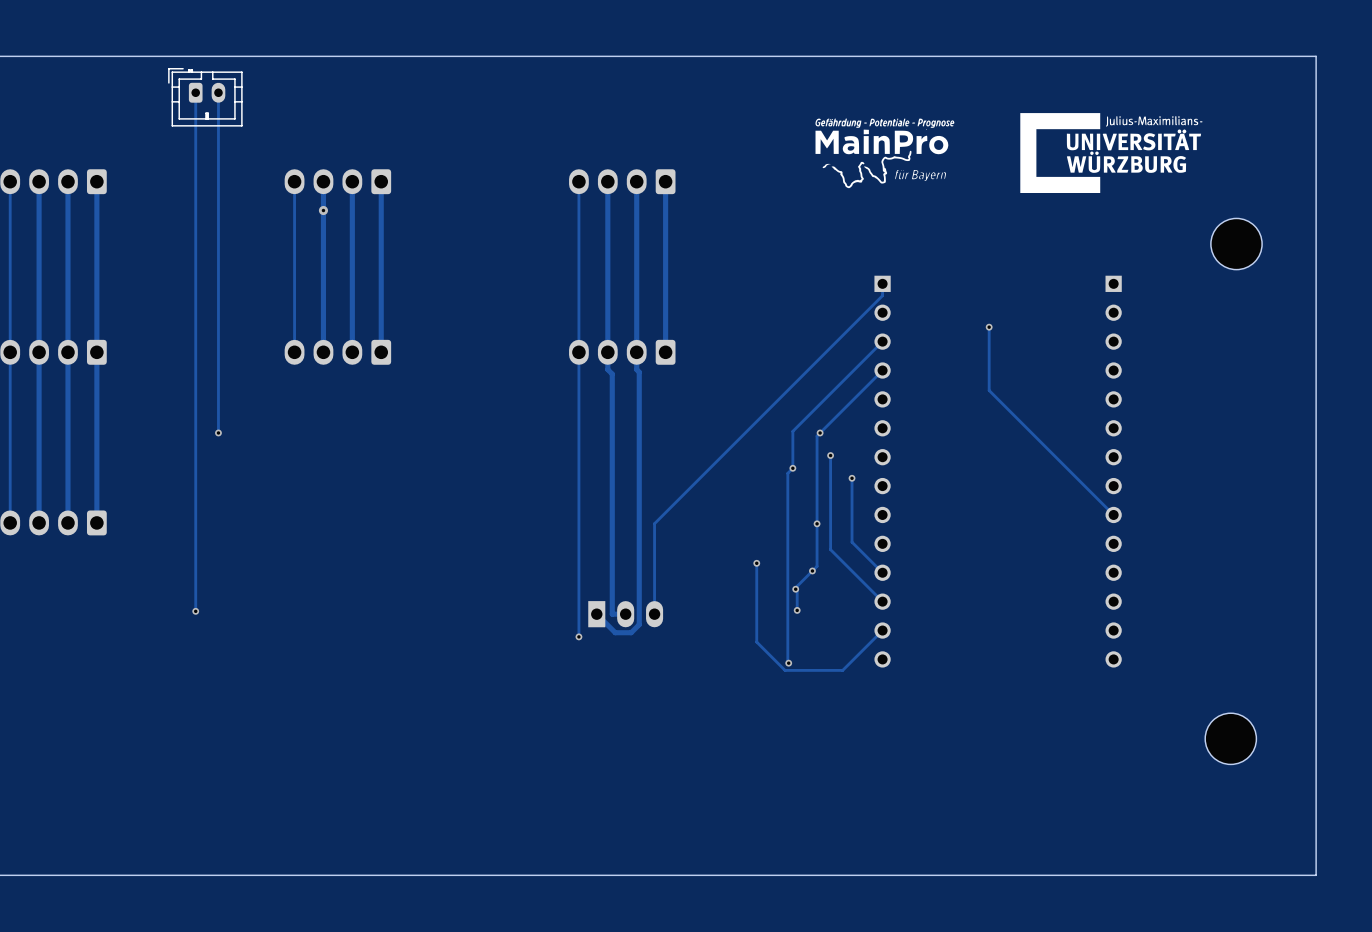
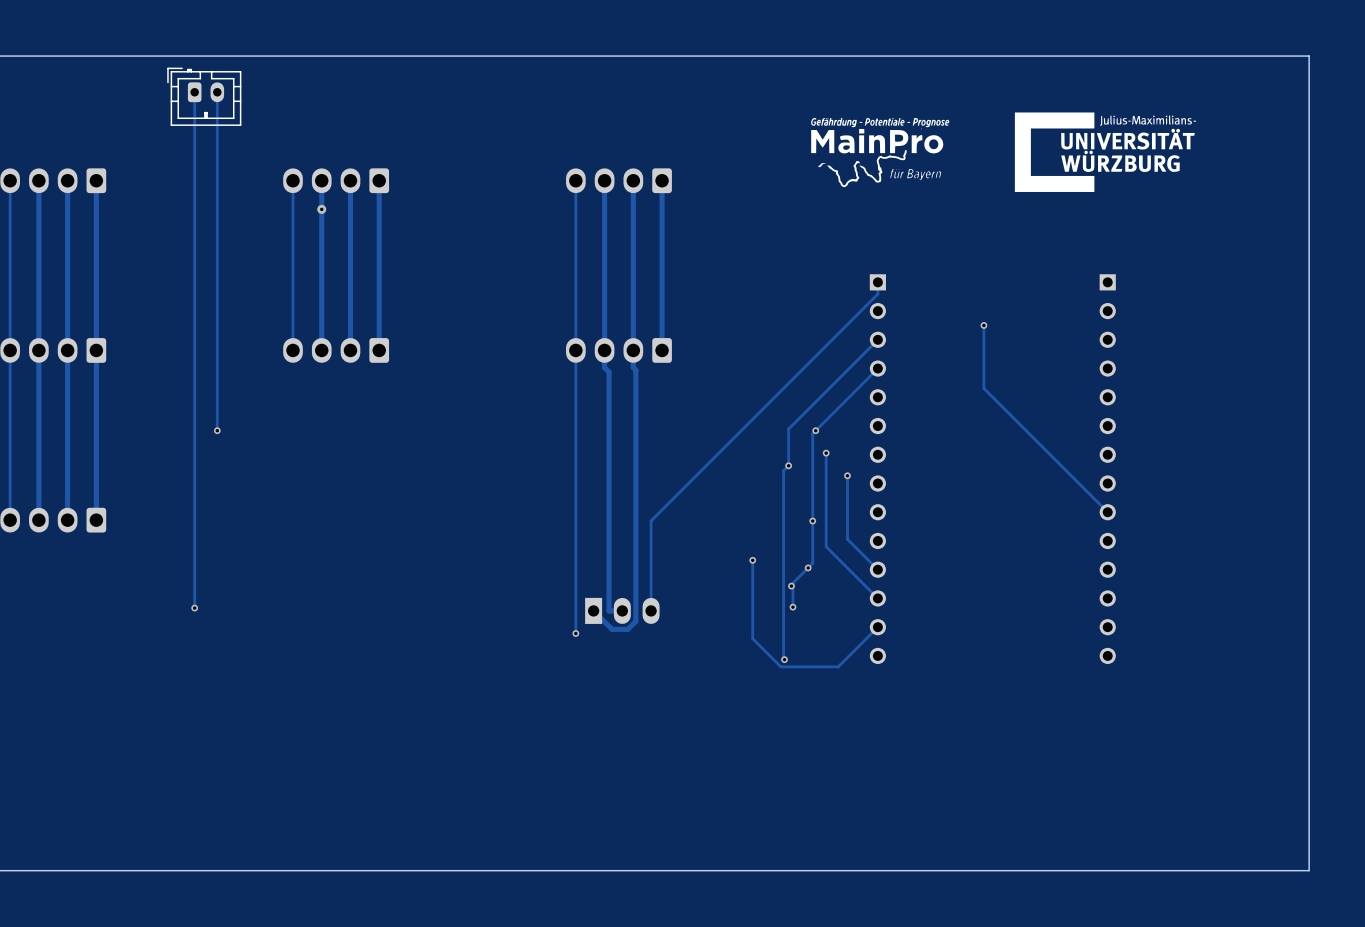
part: (1236, 244) -> none
part: (1230, 738) -> none

